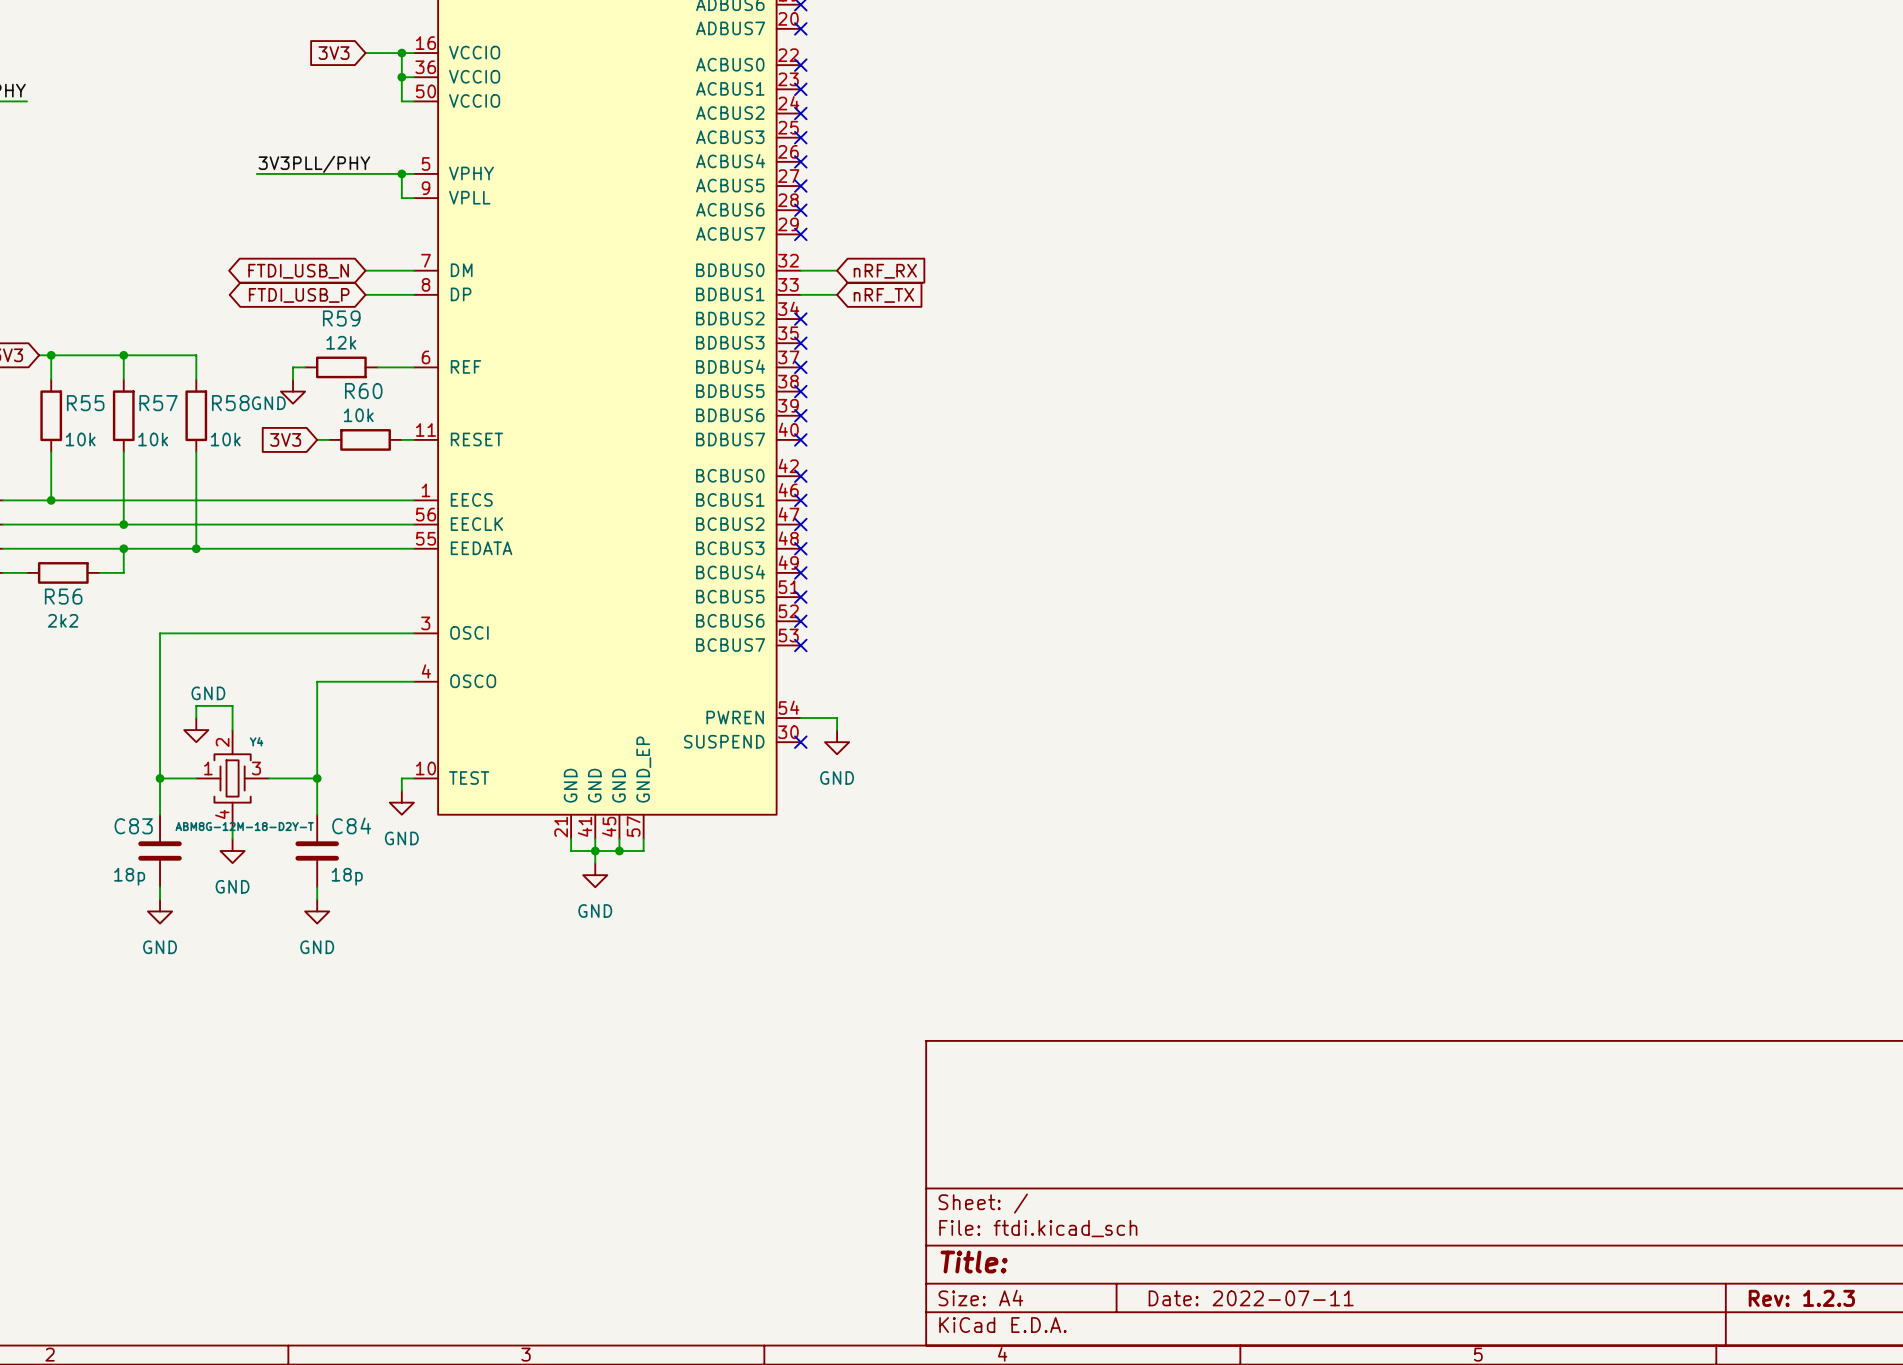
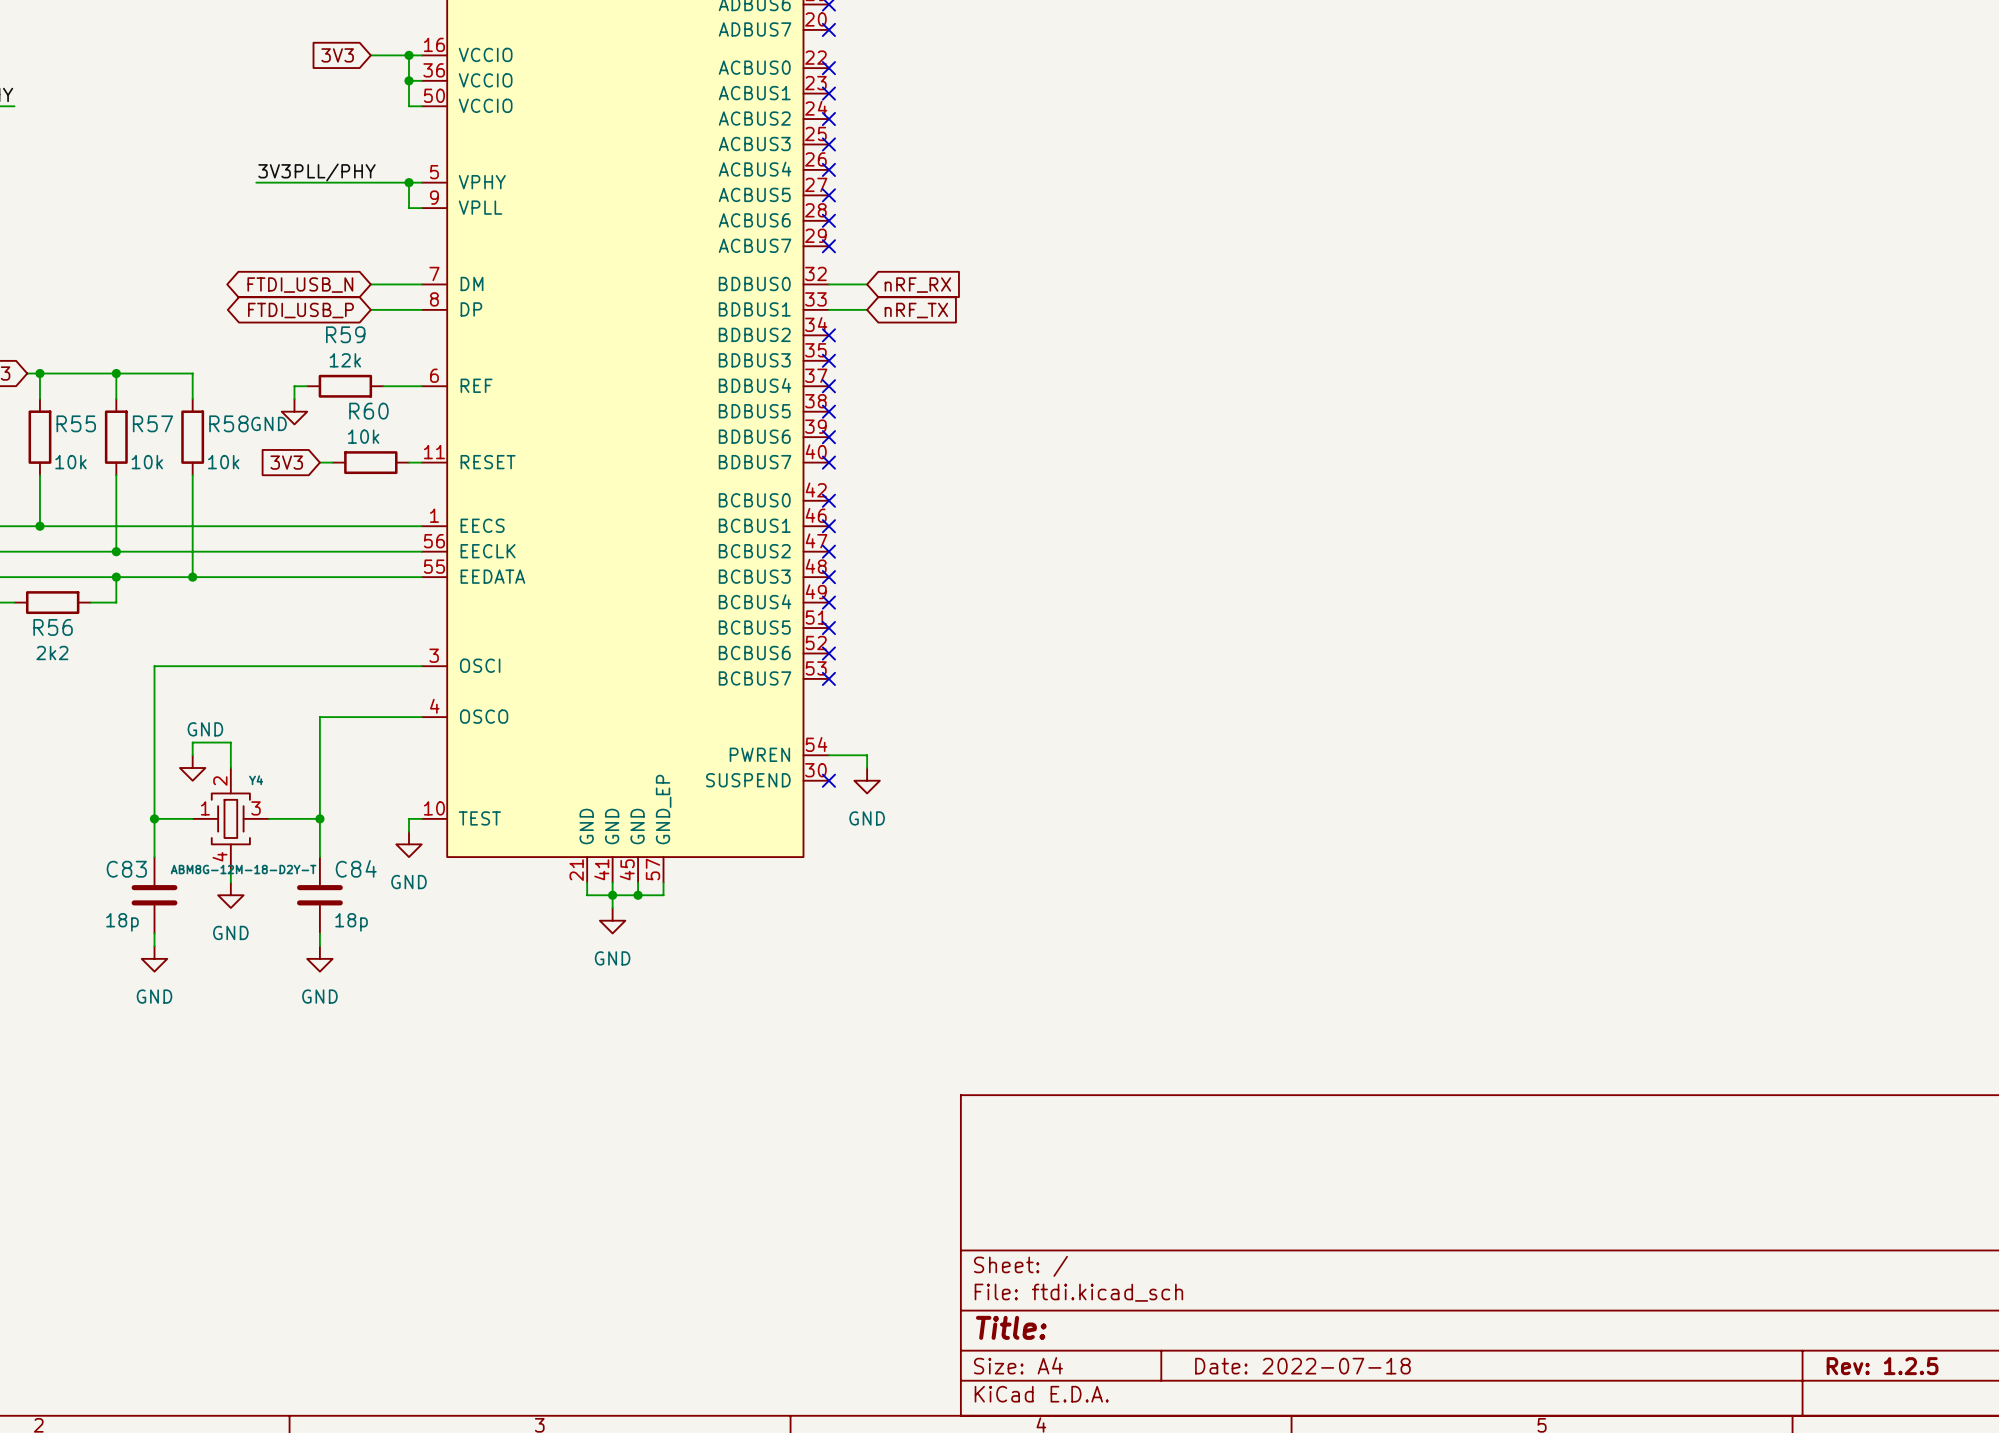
title block: Date: 2022-07-11 (1251, 1298) -> Date: 2022-07-18 (1302, 1366)
title block: Rev: 1.2.3 (1801, 1298) -> Rev: 1.2.5 (1882, 1366)

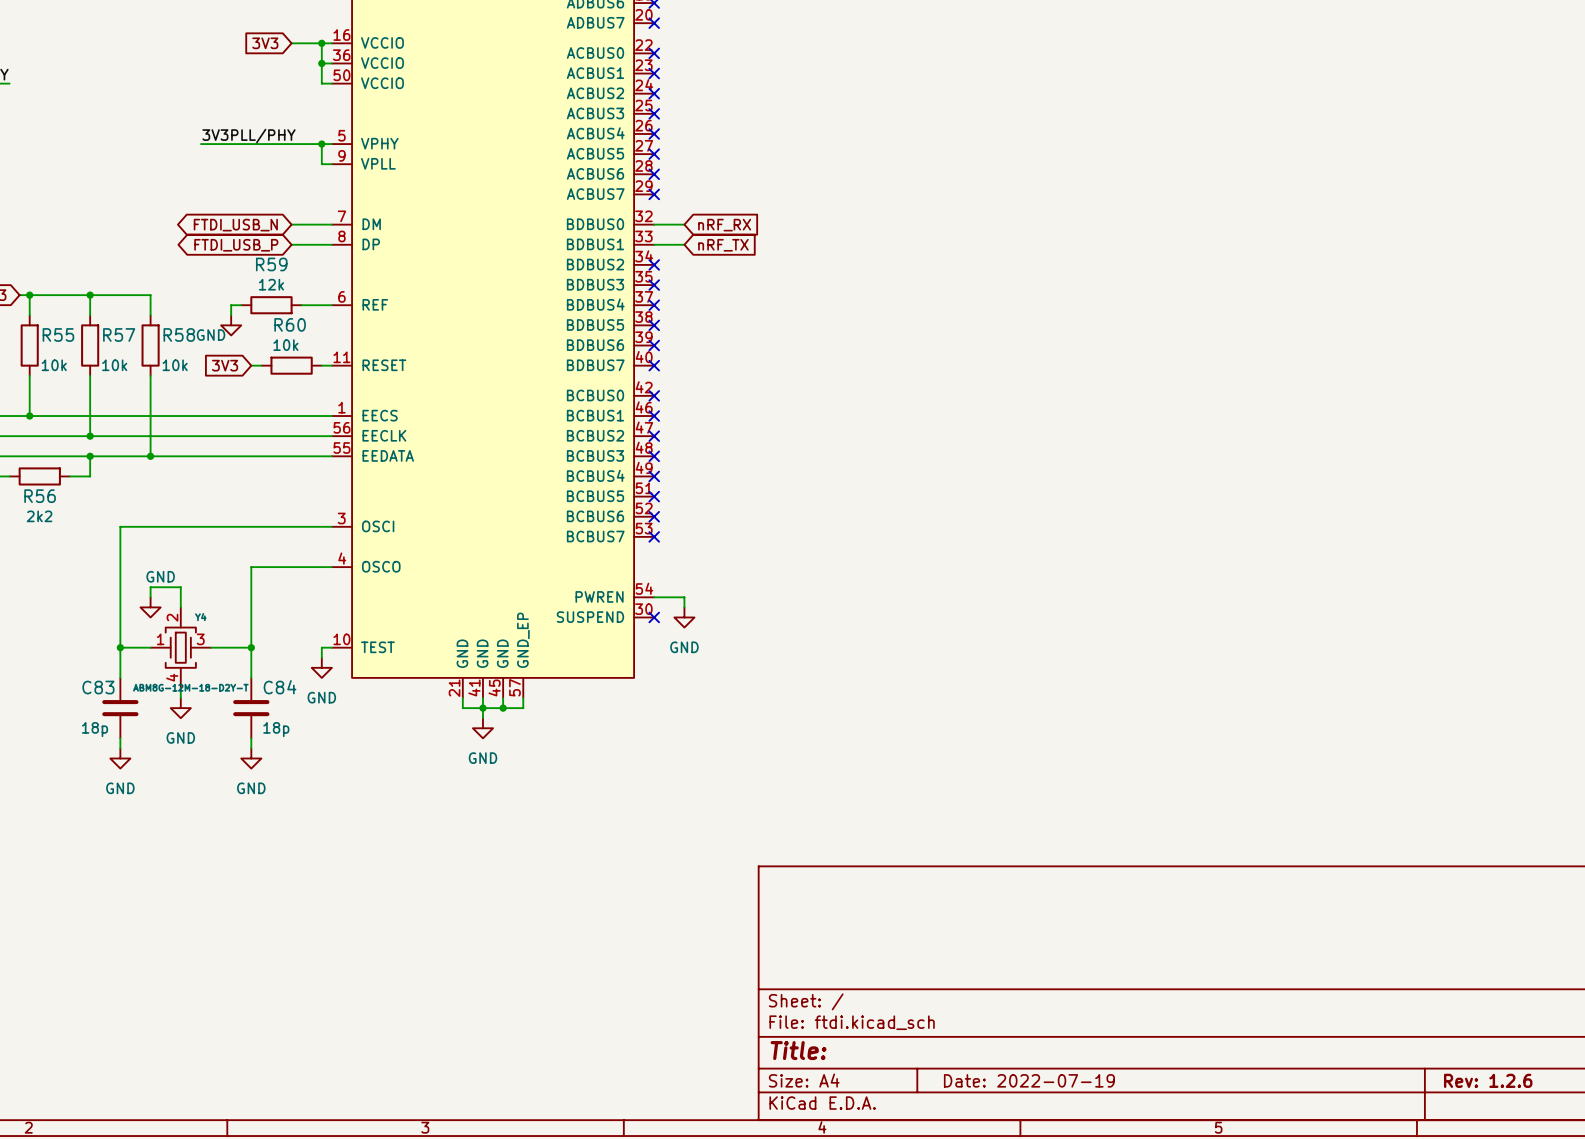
title block: Date: 2022-07-18 (1302, 1366) -> Date: 2022-07-19 (1029, 1080)
title block: Rev: 1.2.5 (1882, 1366) -> Rev: 1.2.6 (1488, 1080)

